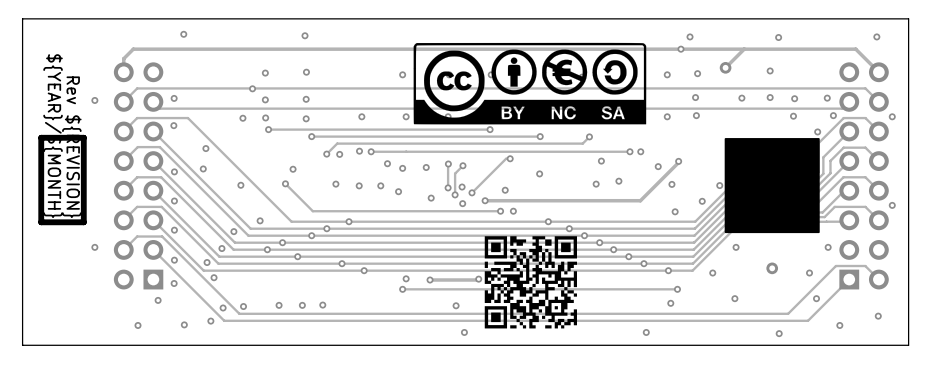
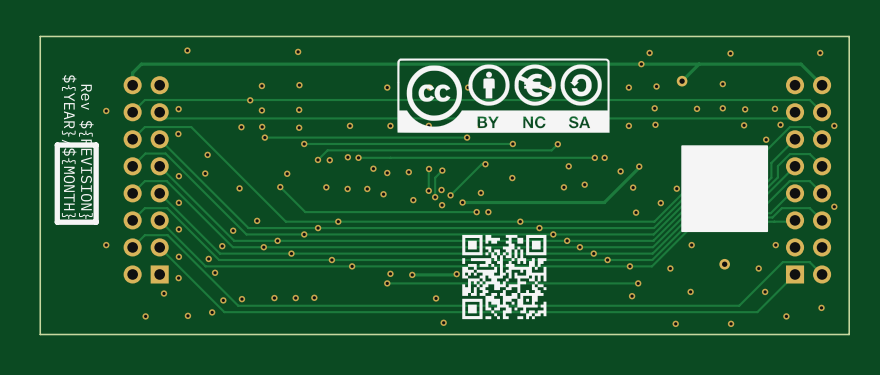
via: (646, 332) -> none
via: none -> (675, 323)

